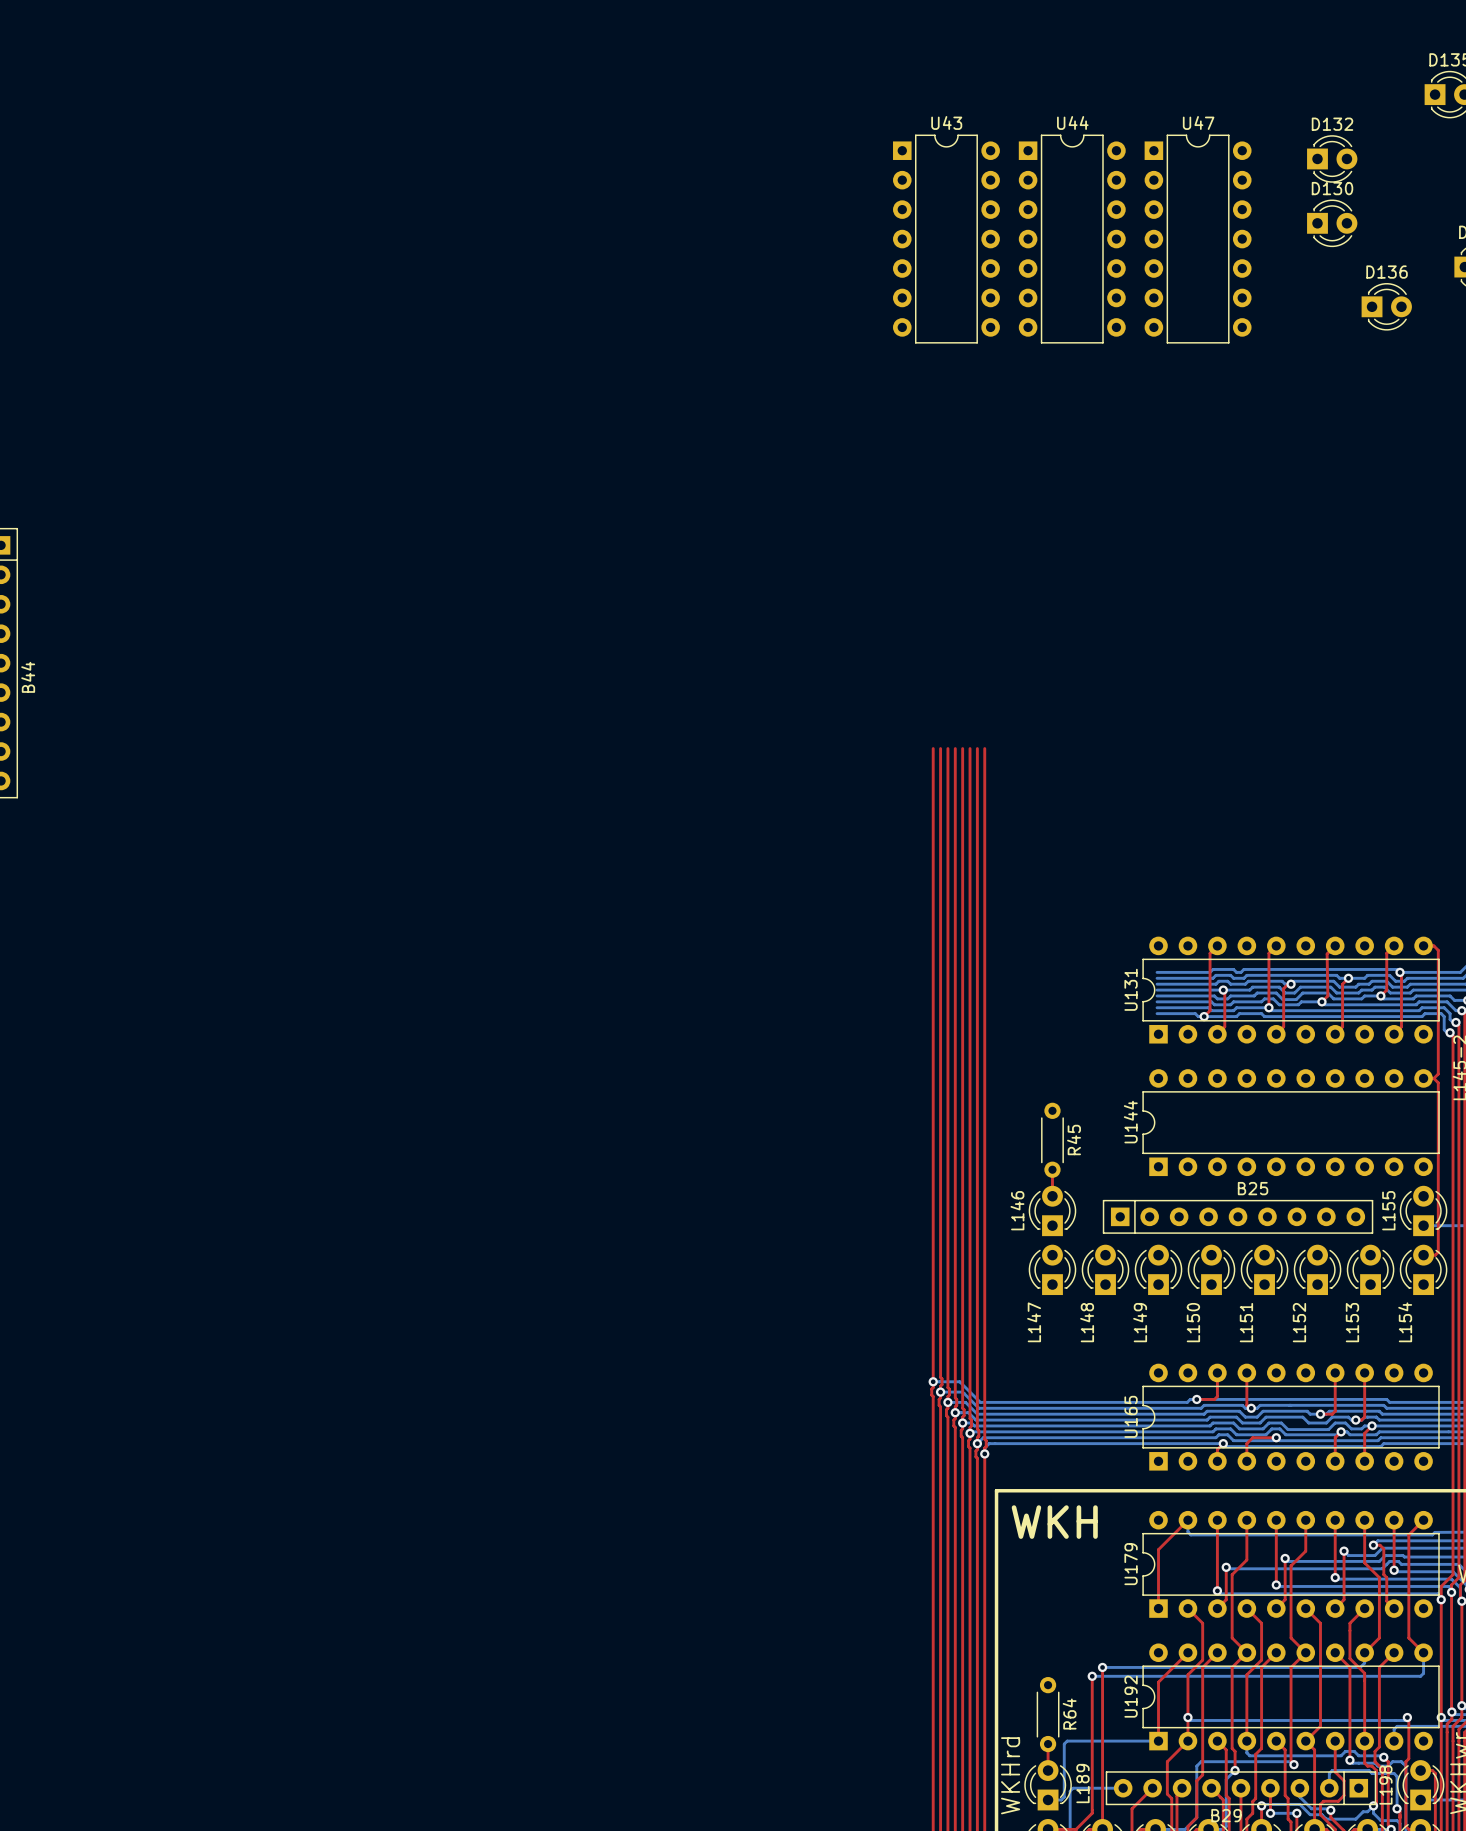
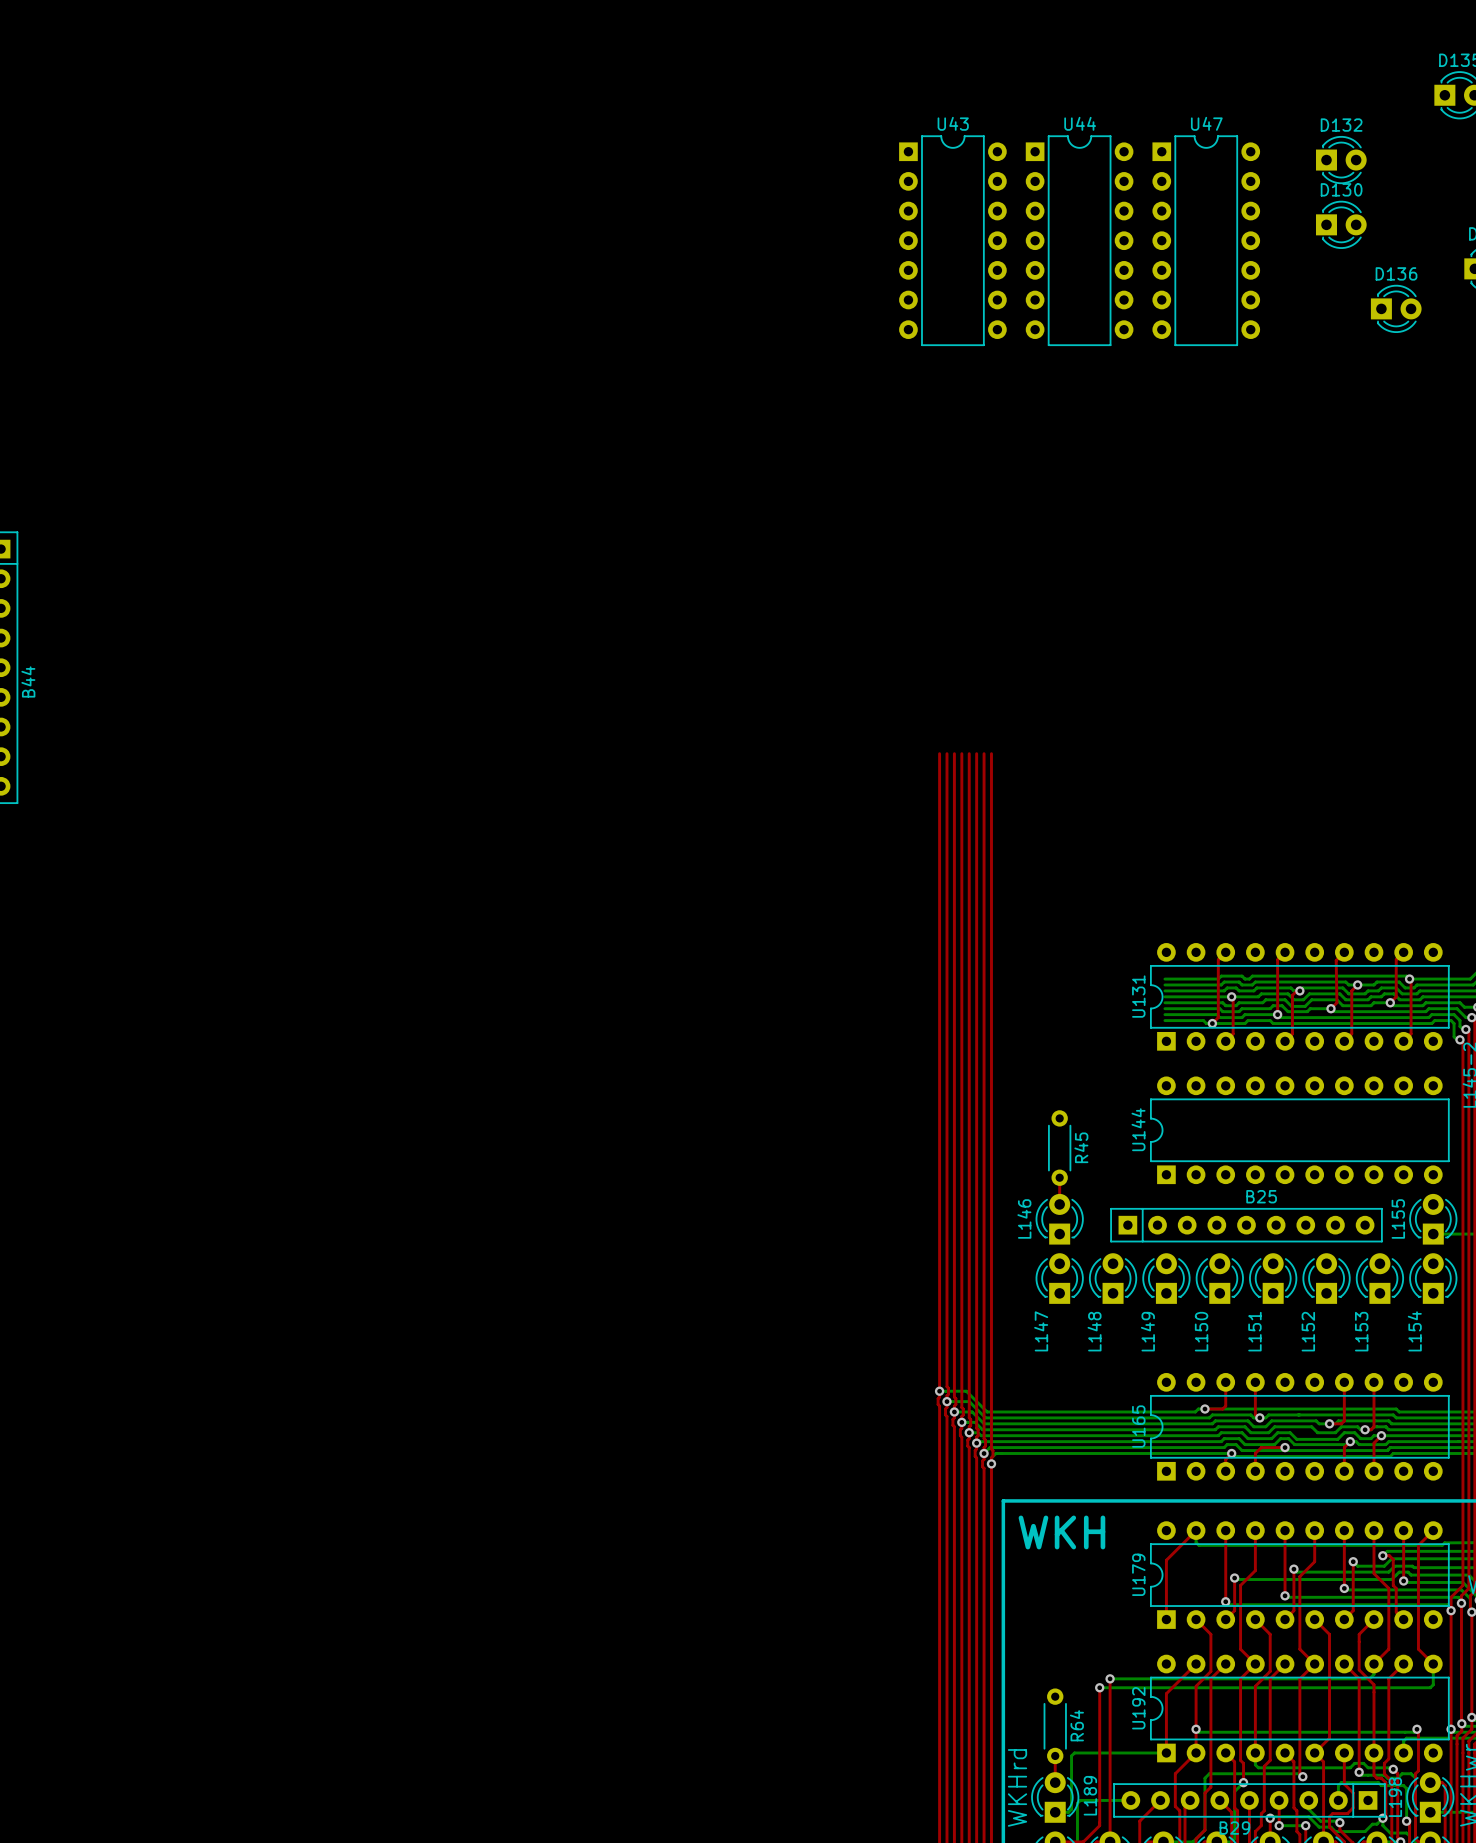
top track: (1423, 945) (1433, 945) (1438, 950) (1438, 1074) (1433, 1078) -> none
top track: (1433, 1078) (1438, 1082) (1438, 1252) (1435, 1255) (1423, 1255) -> none

